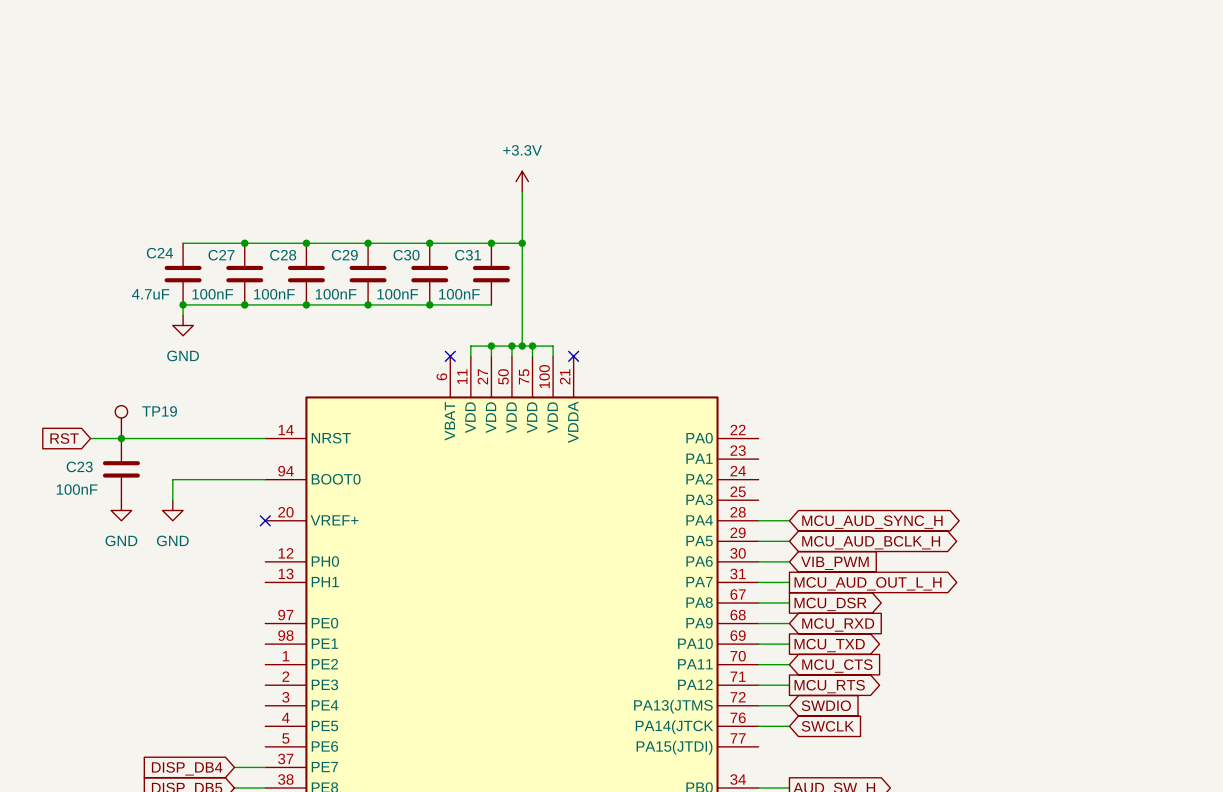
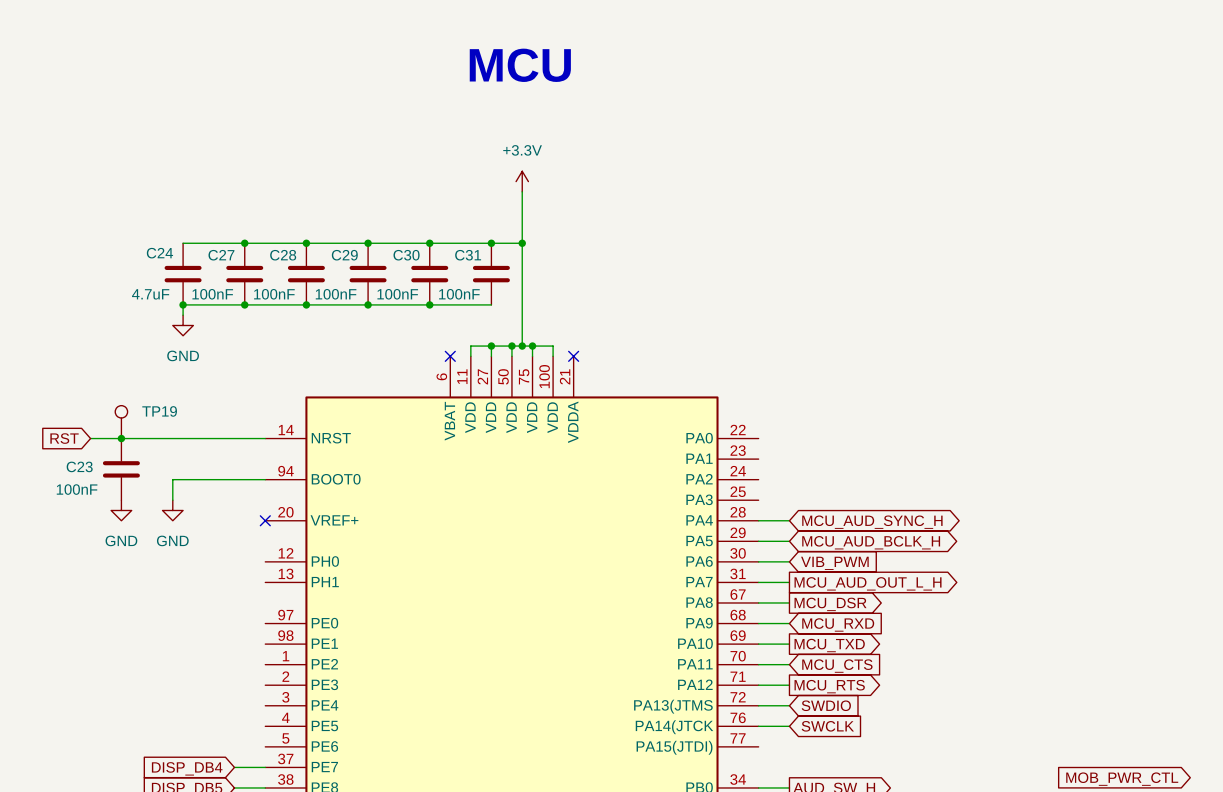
text: none -> MCU (520, 65)
global label: none -> MOB_PWR_CTL (1122, 779)

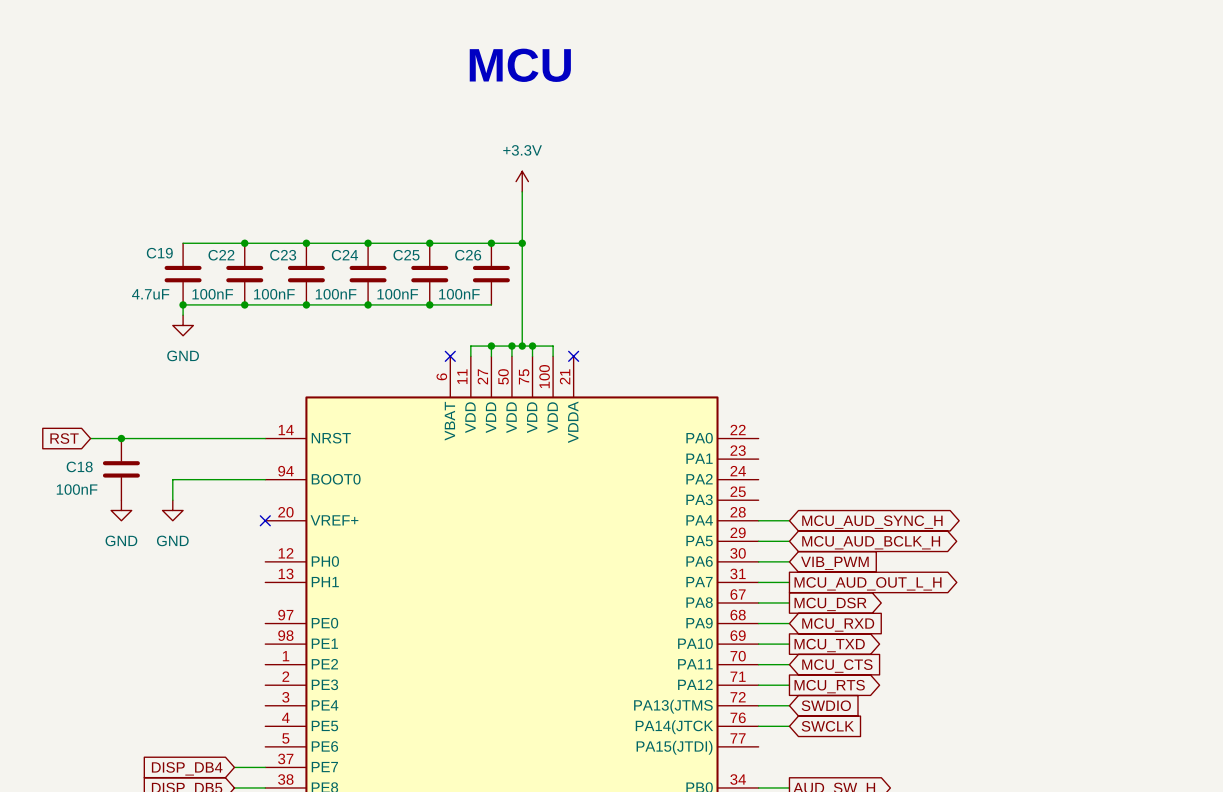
C24 name: C24 (159, 253) -> C19 (159, 253)
C27 name: C27 (221, 255) -> C22 (221, 255)
C28 name: C28 (283, 255) -> C23 (283, 255)
C29 name: C29 (344, 255) -> C24 (344, 255)
C30 name: C30 (406, 255) -> C25 (406, 255)
C31 name: C31 (468, 255) -> C26 (468, 255)
TP19: (121, 422) -> none
C23 name: C23 (79, 466) -> C18 (79, 466)
global label: MOB_PWR_CTL (1122, 779) -> none

